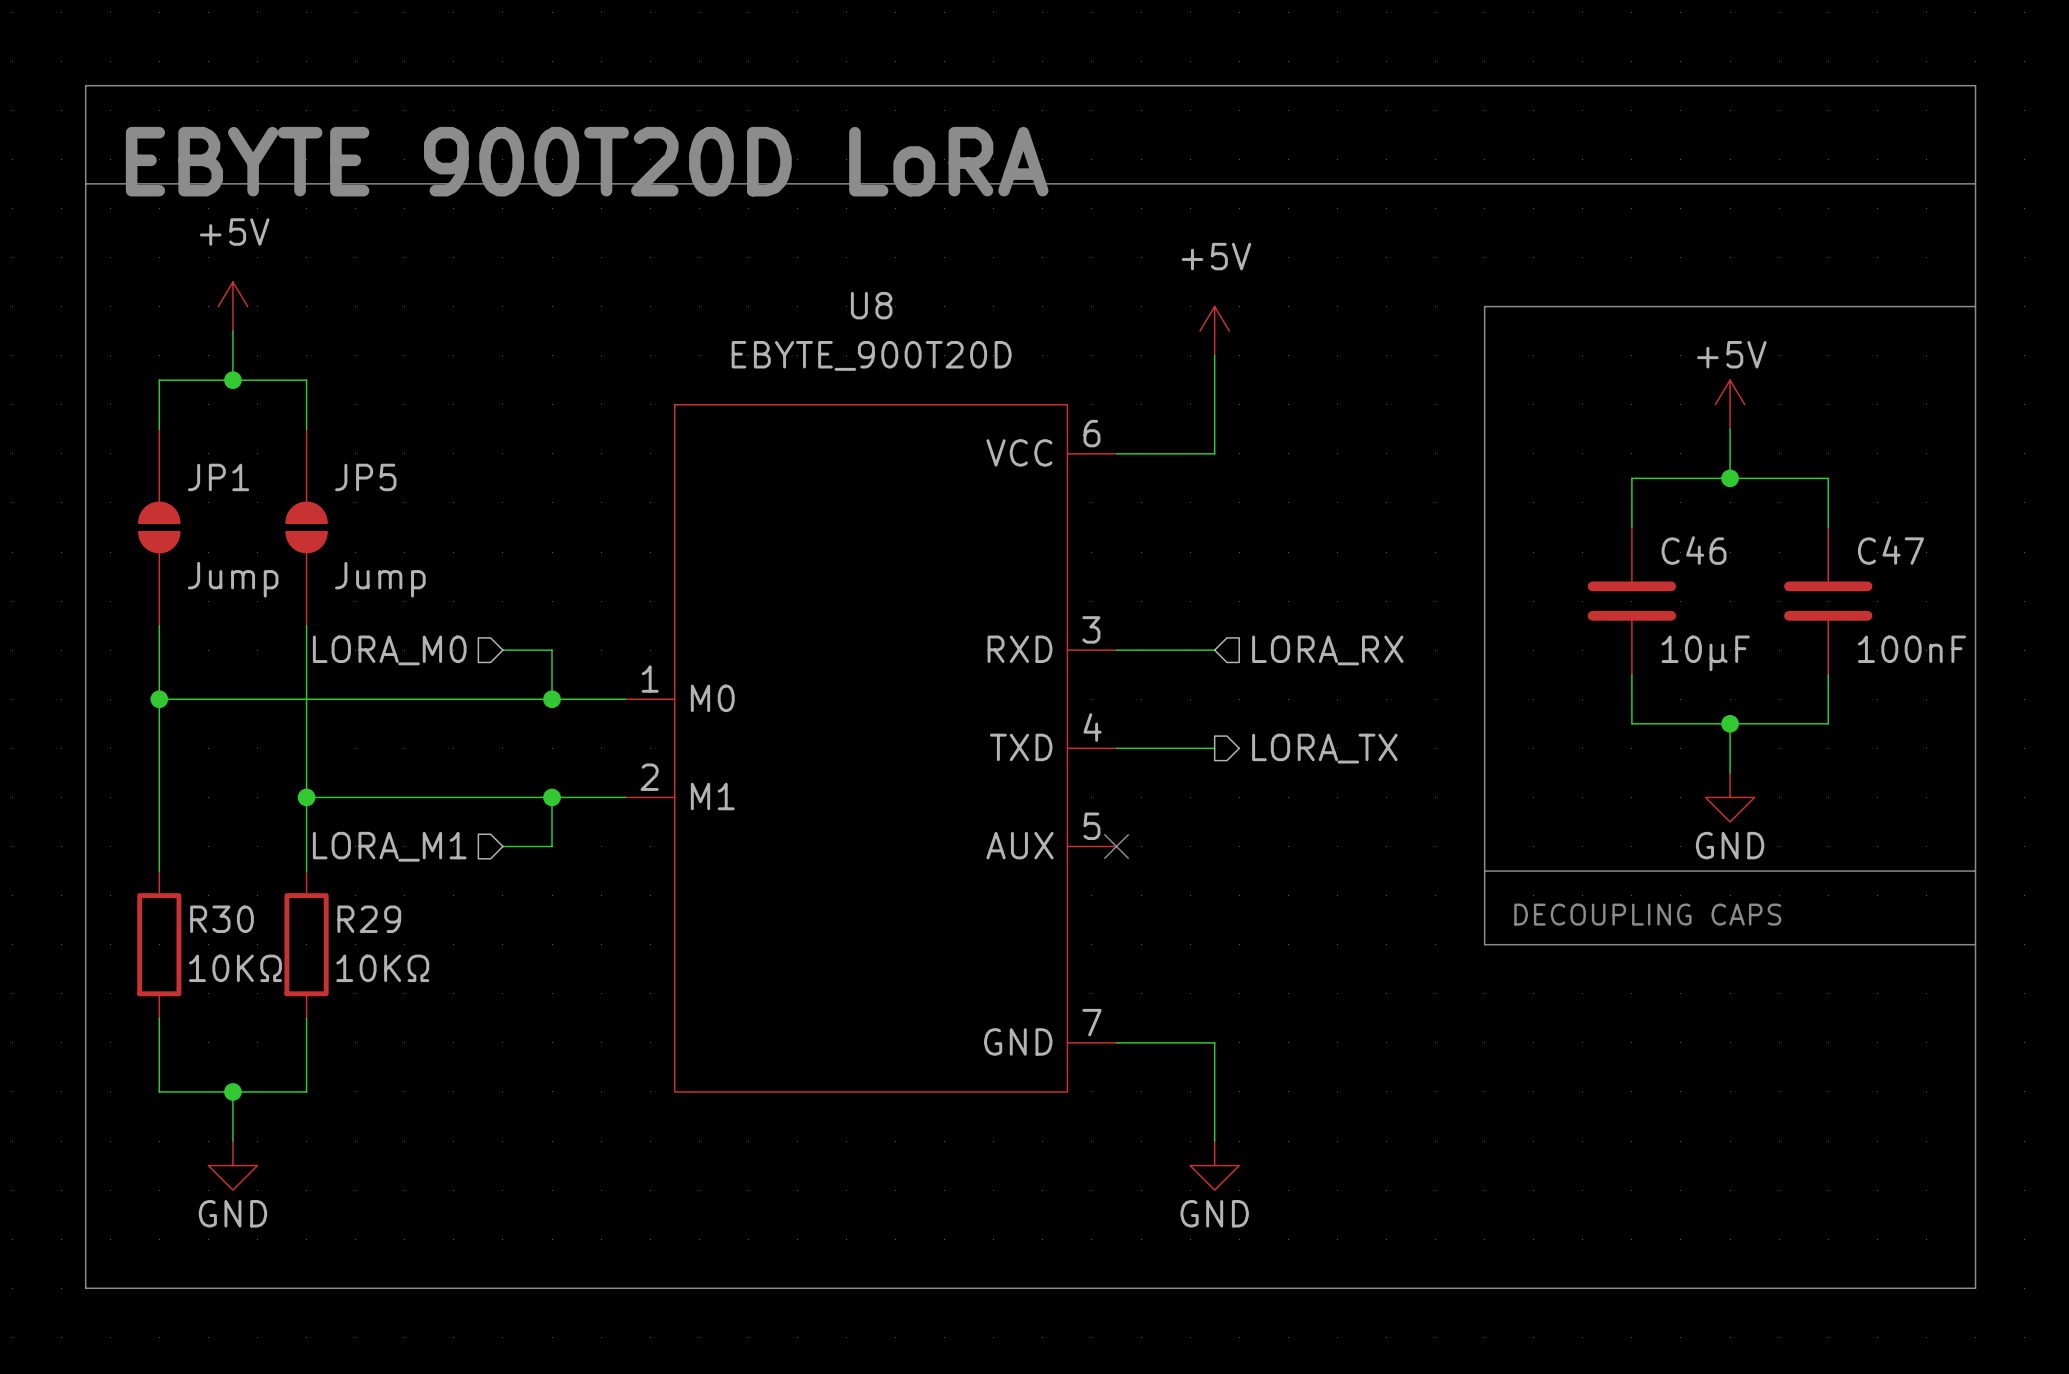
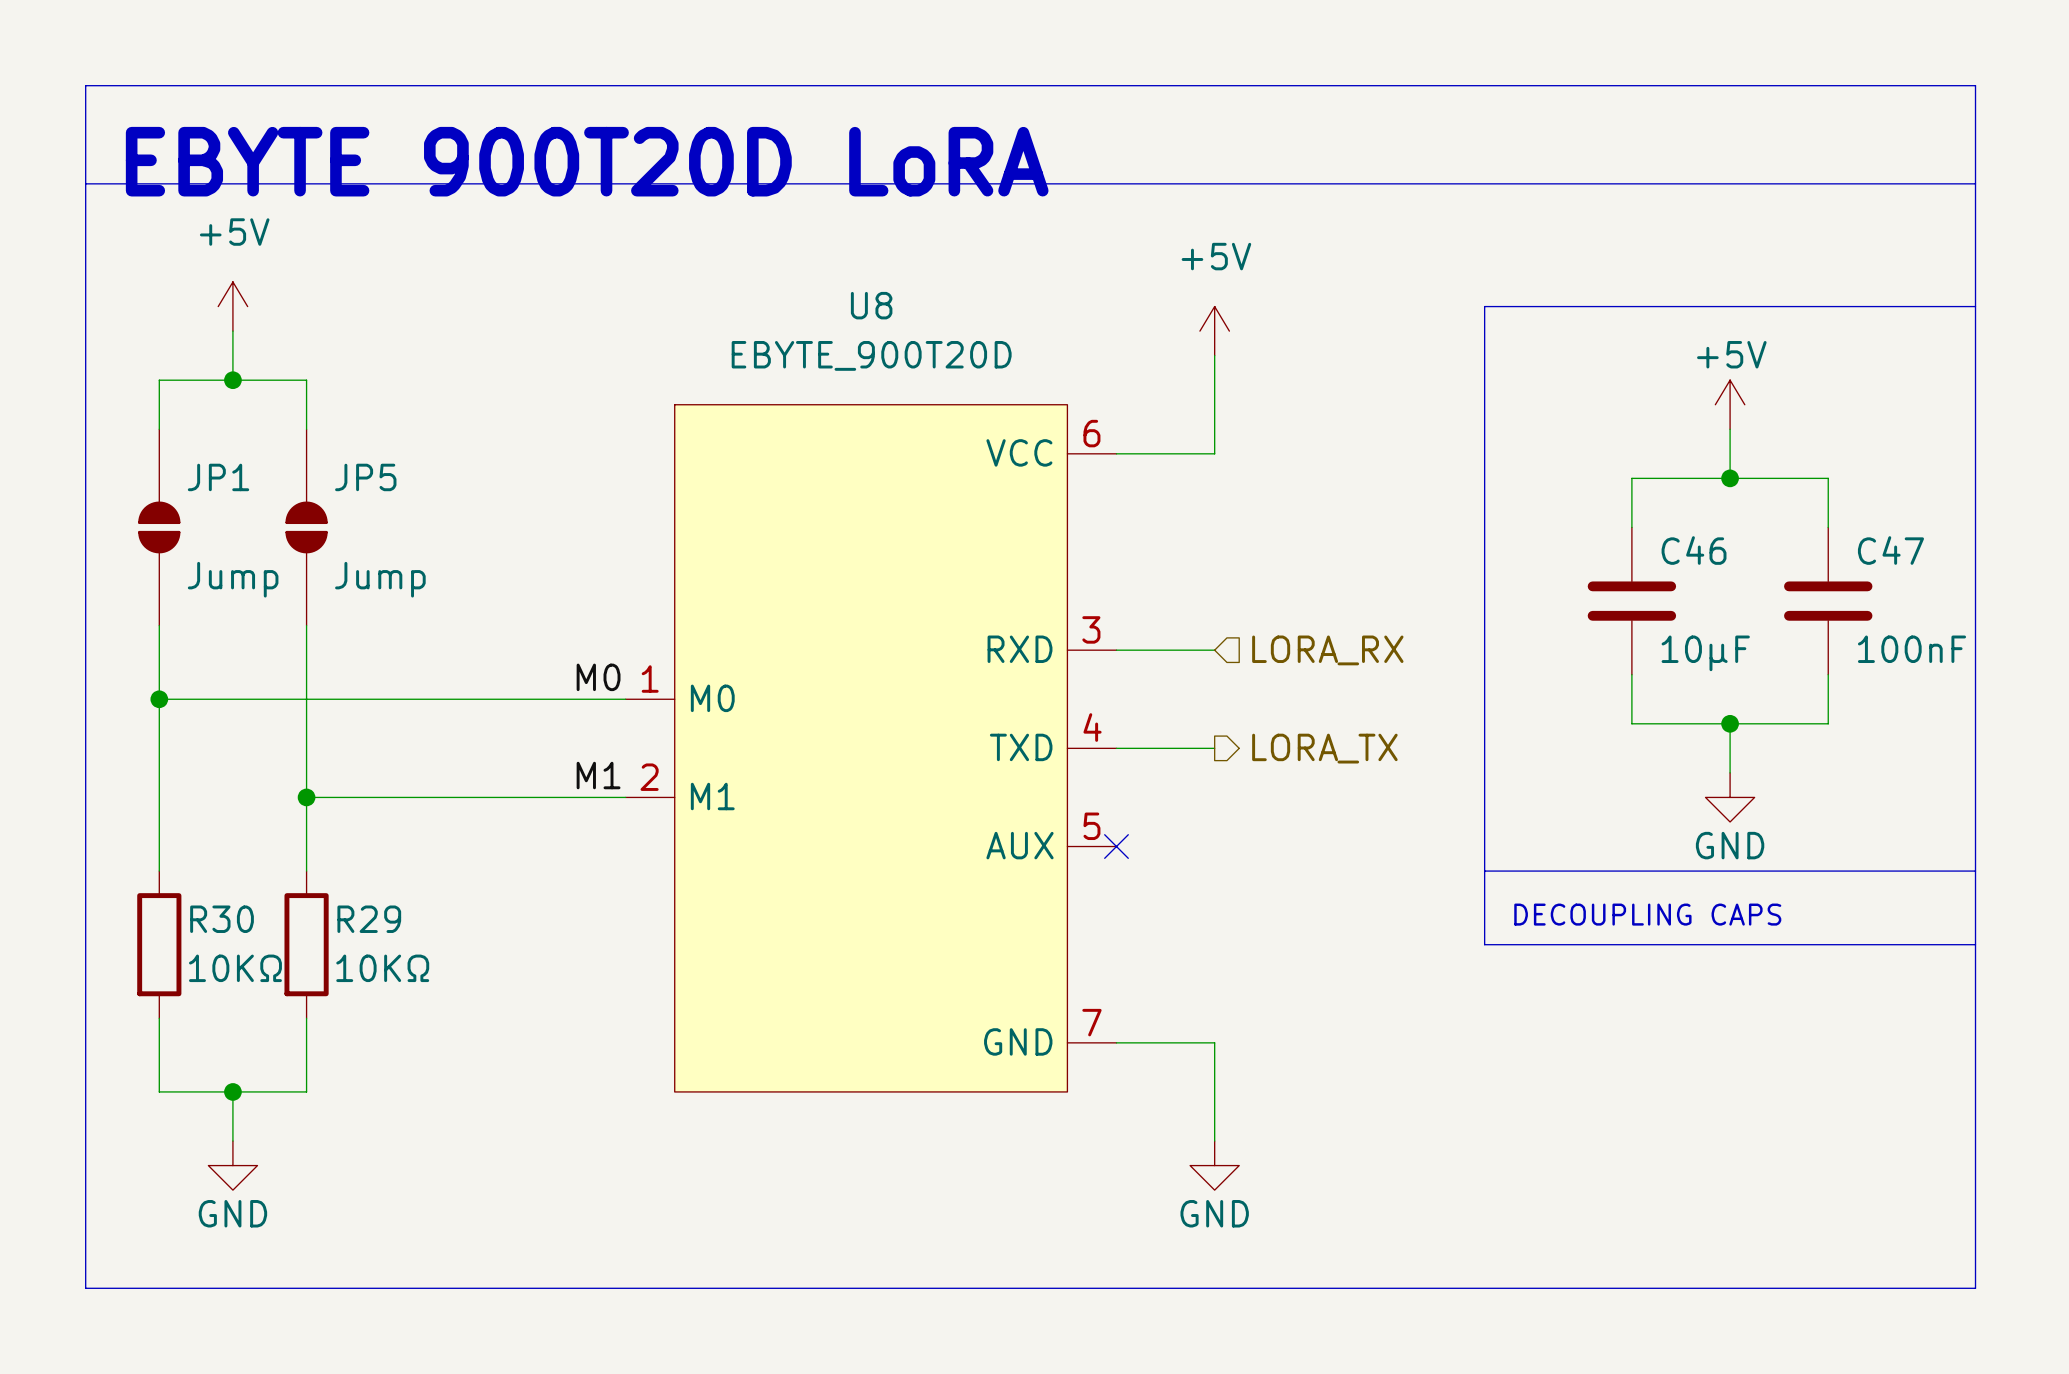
hierarchical label: LORA_M0 (389, 650) -> none
wire: (502, 650) (552, 650) (552, 699) -> none
label: none -> M0 (598, 677)
junction: (552, 699) -> none
label: none -> M1 (598, 775)
wire: (552, 797) (552, 846) (502, 846) -> none
junction: (552, 797) -> none
hierarchical label: LORA_M1 (389, 846) -> none

